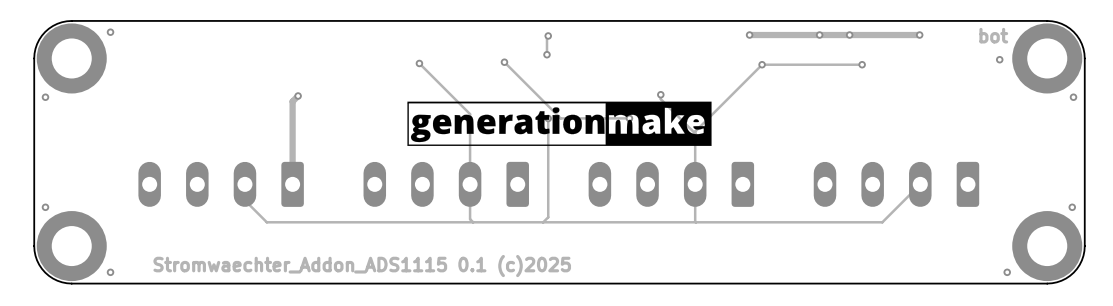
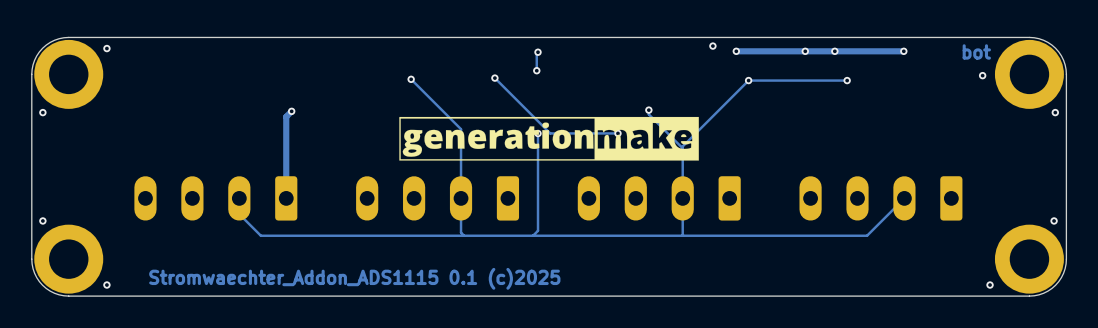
via: none -> (712, 46)

